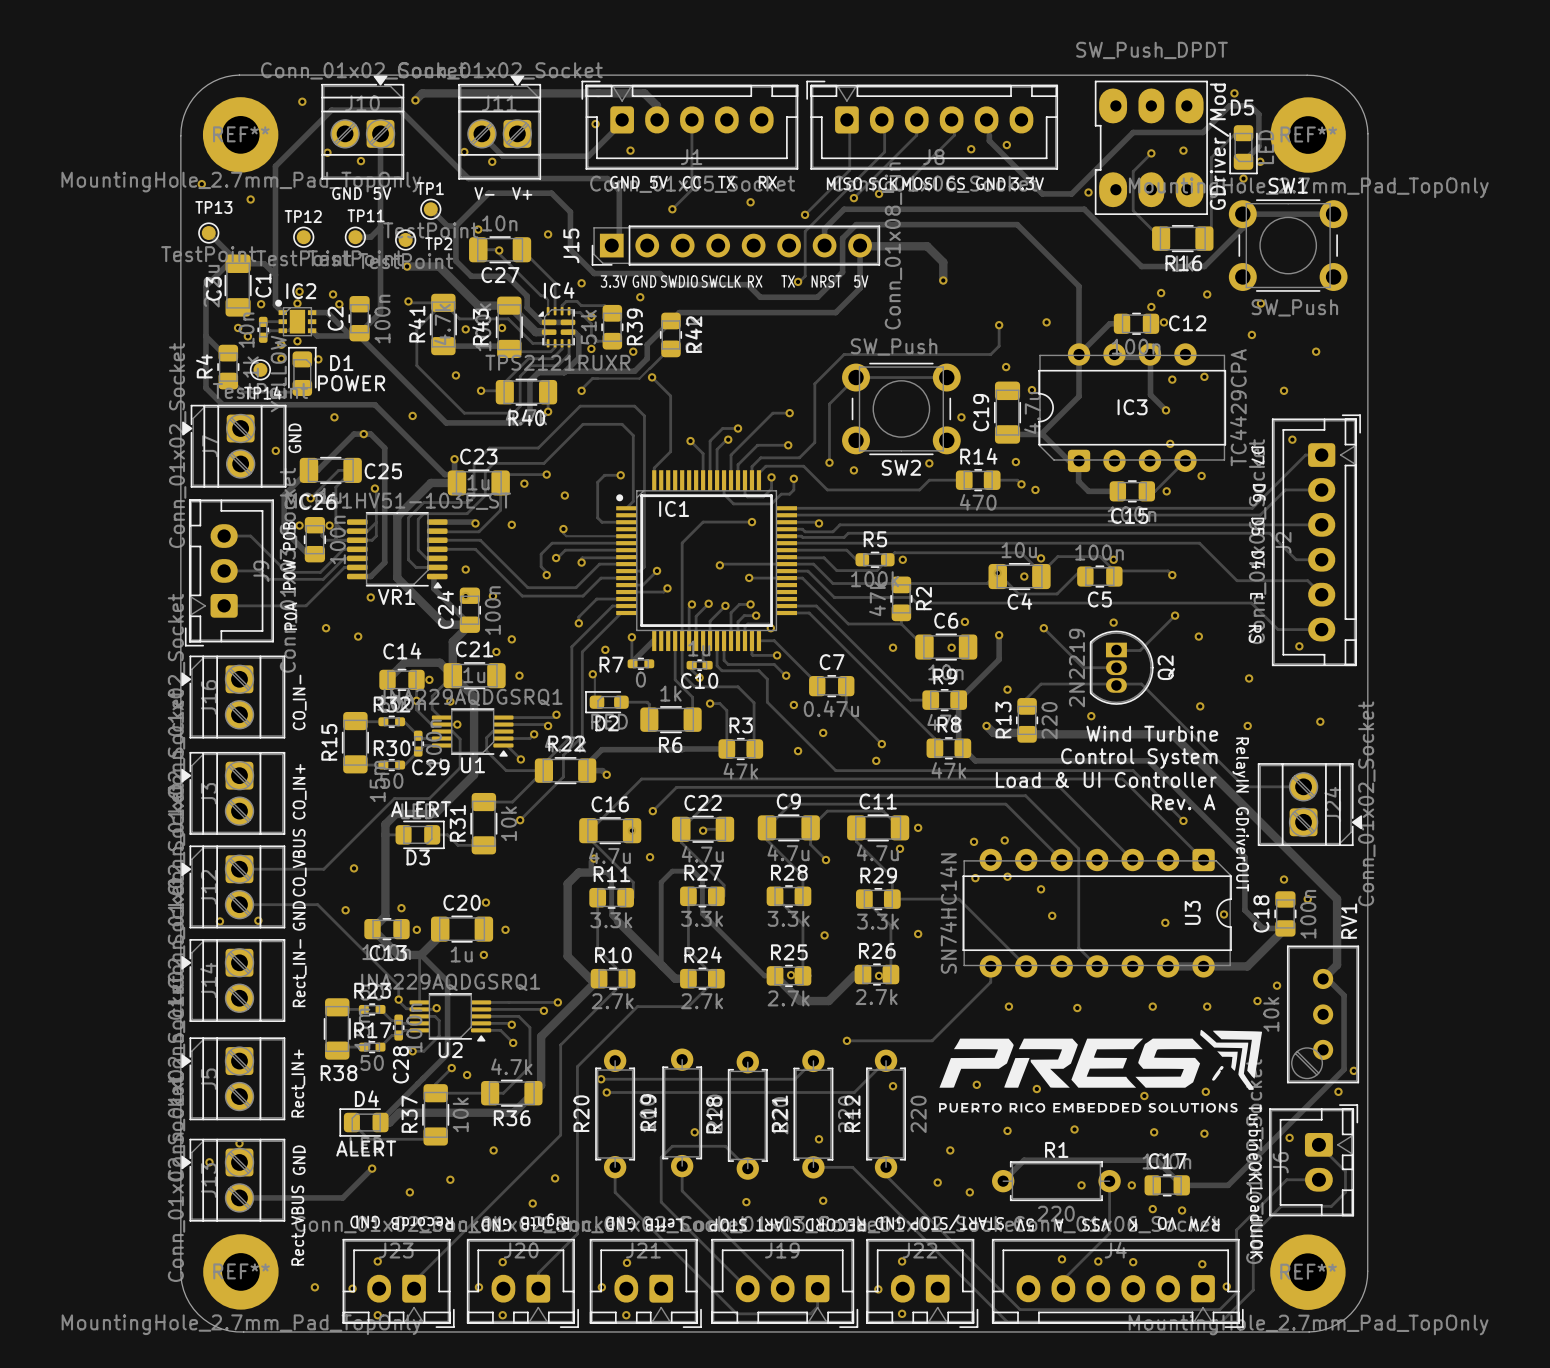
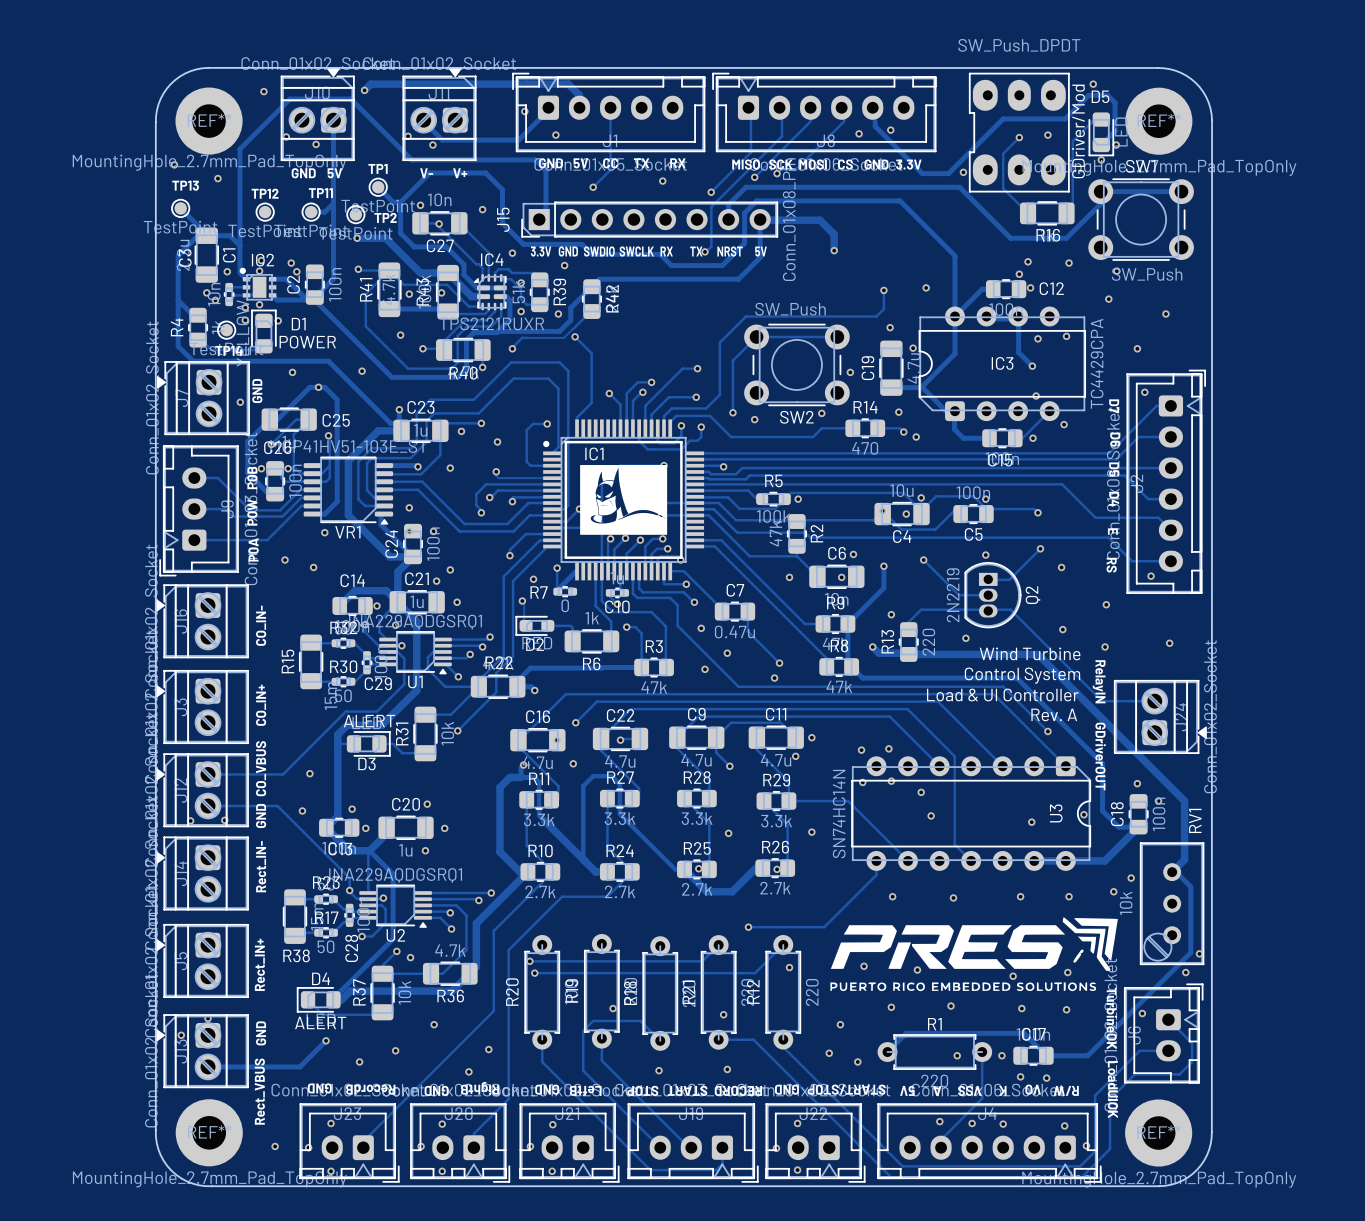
drawing: none -> [580, 465, 668, 535]

